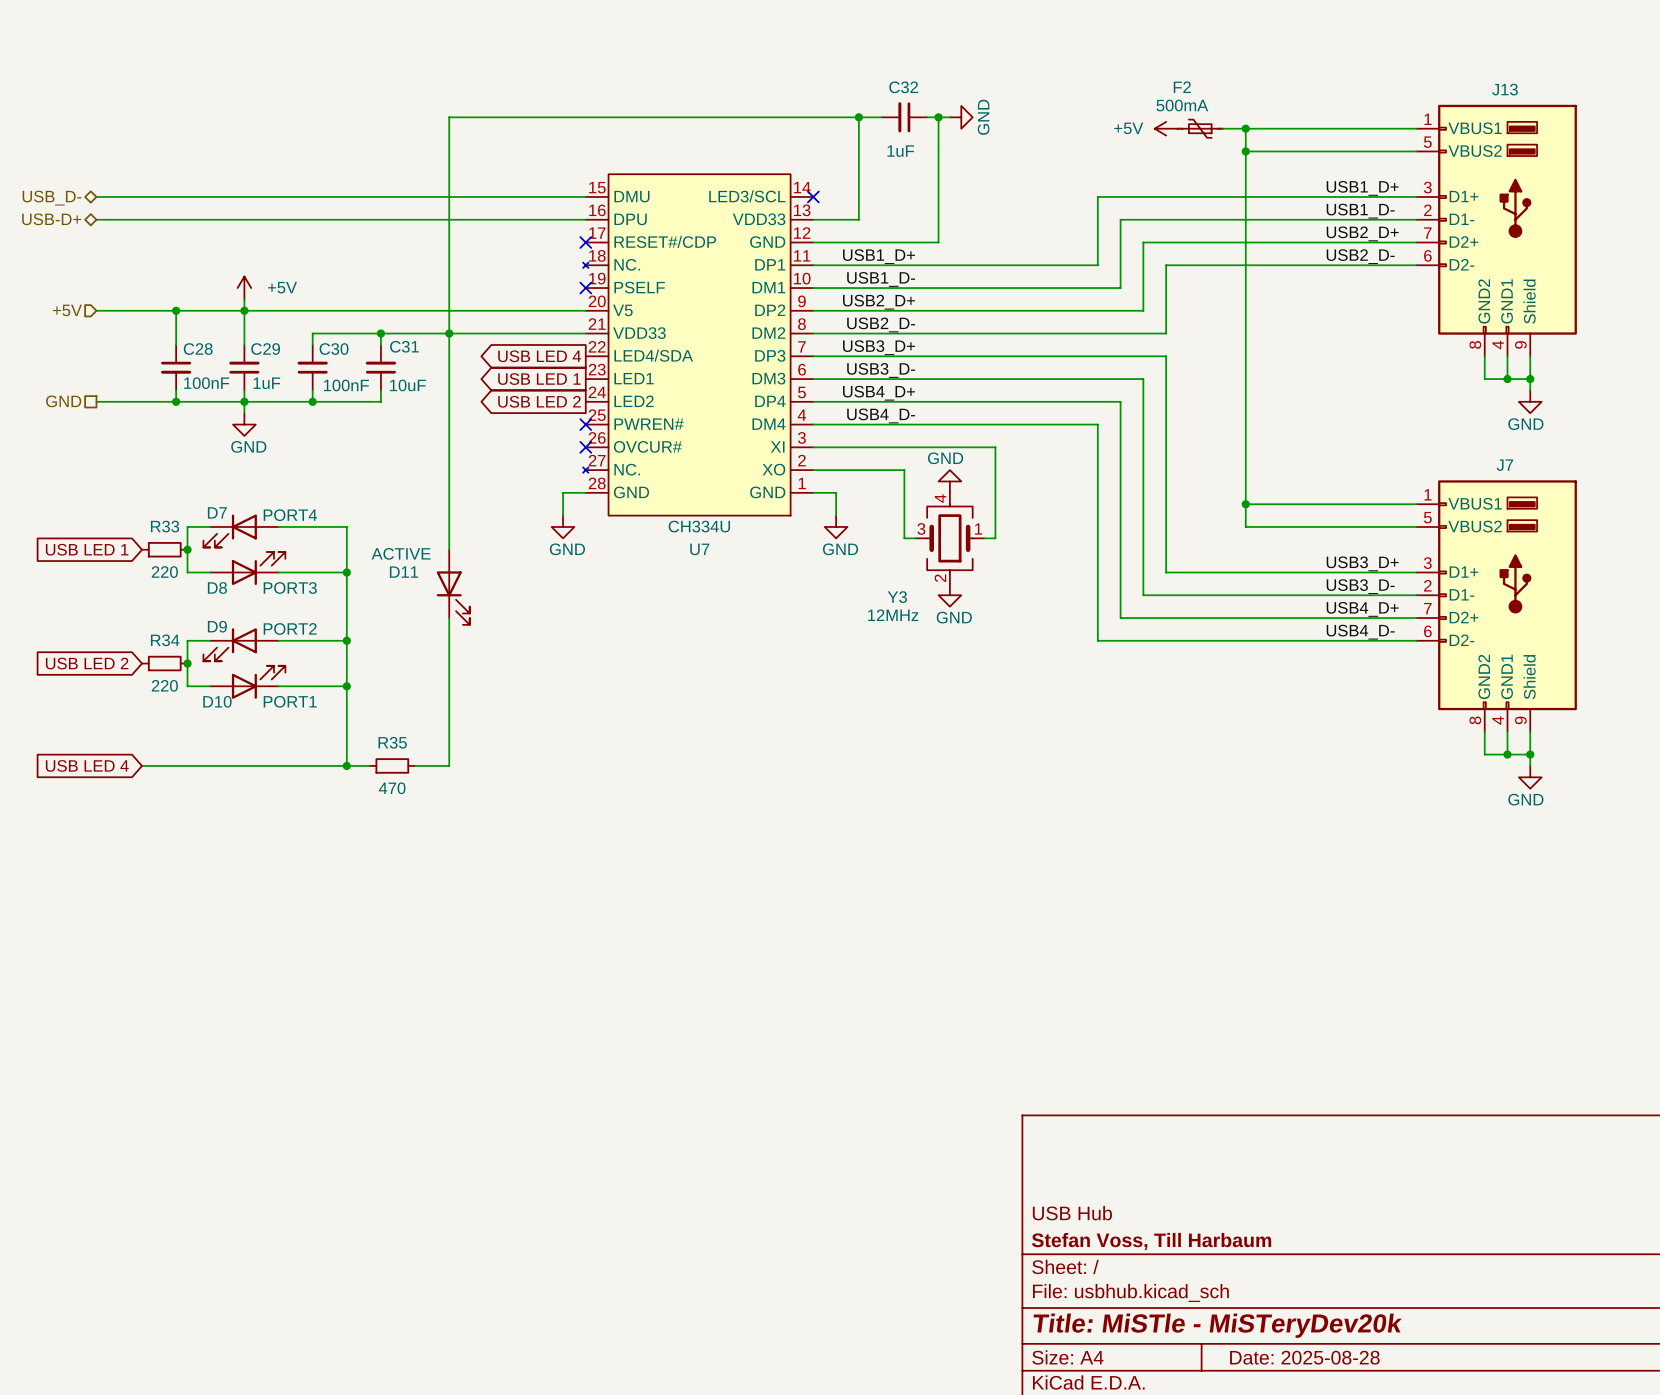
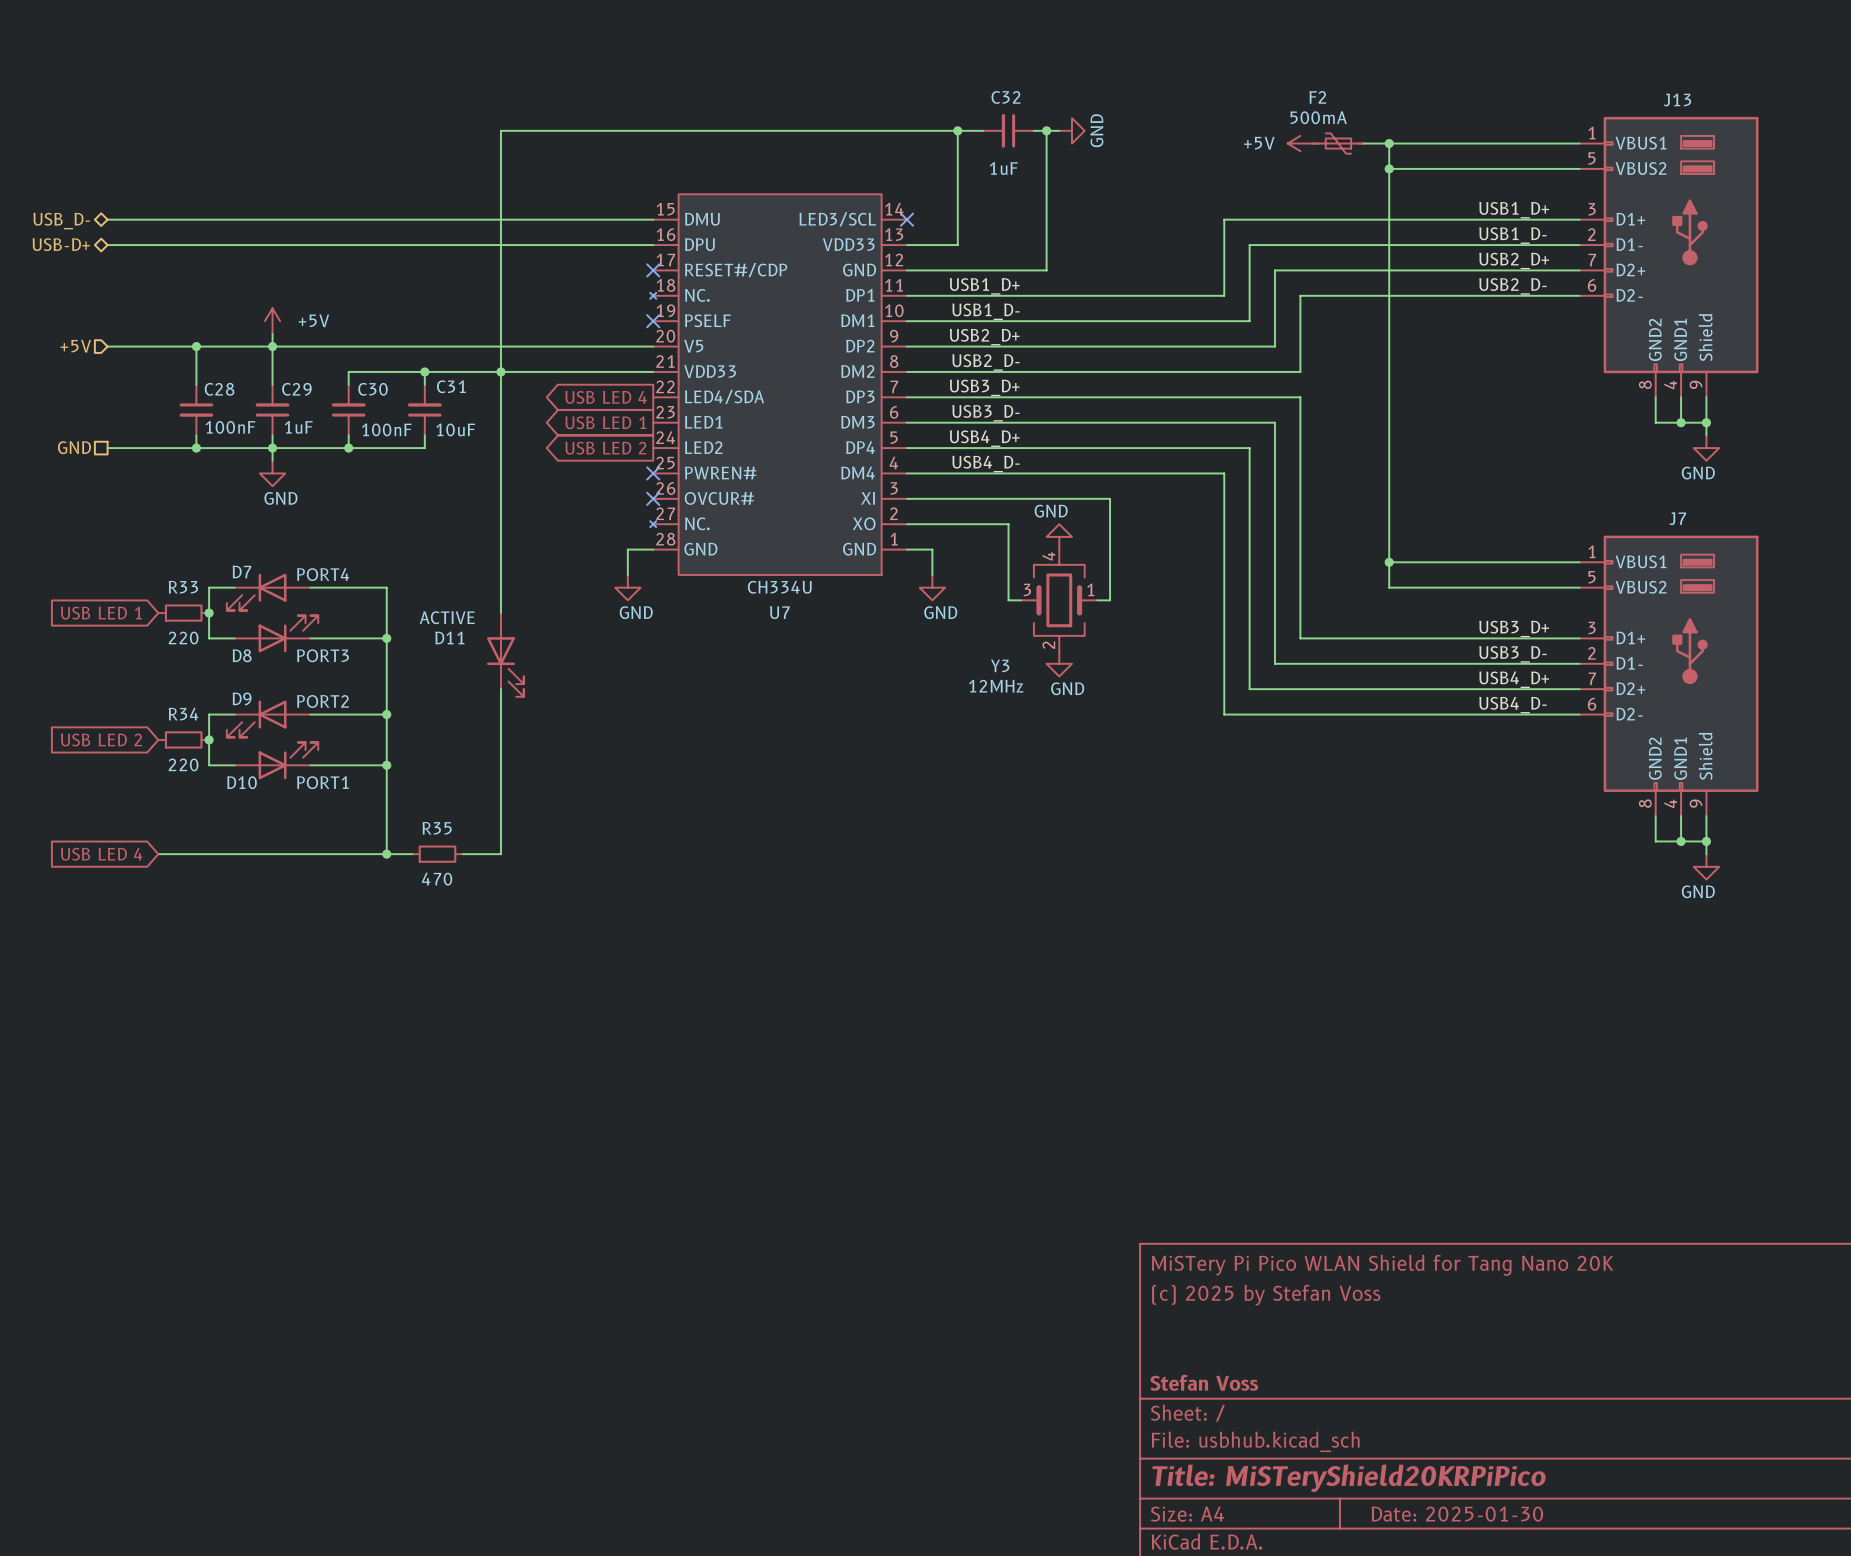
title block: none -> MiSTery Pi Pico WLAN Shield for Tang Nano 20K (1382, 1265)
title block: none -> (c) 2025 by Stefan Voss (1266, 1295)
title block: USB Hub (1072, 1213) -> none
title block: Stefan Voss, Till Harbaum (1151, 1241) -> Stefan Voss (1204, 1382)
title block: Title: MiSTle - MiSTeryDev20k (1217, 1325) -> Title: MiSTeryShield20KRPiPico (1349, 1478)
title block: Date: 2025-08-28 (1304, 1357) -> Date: 2025-01-30 (1457, 1514)

